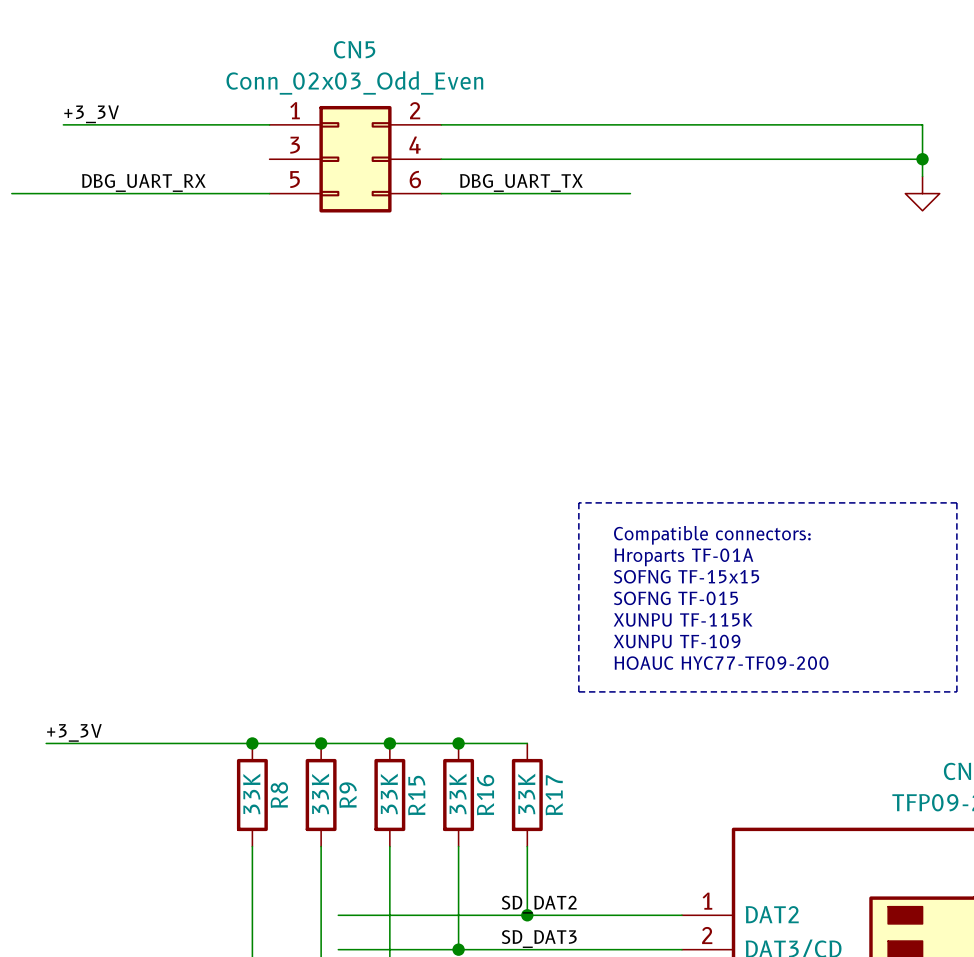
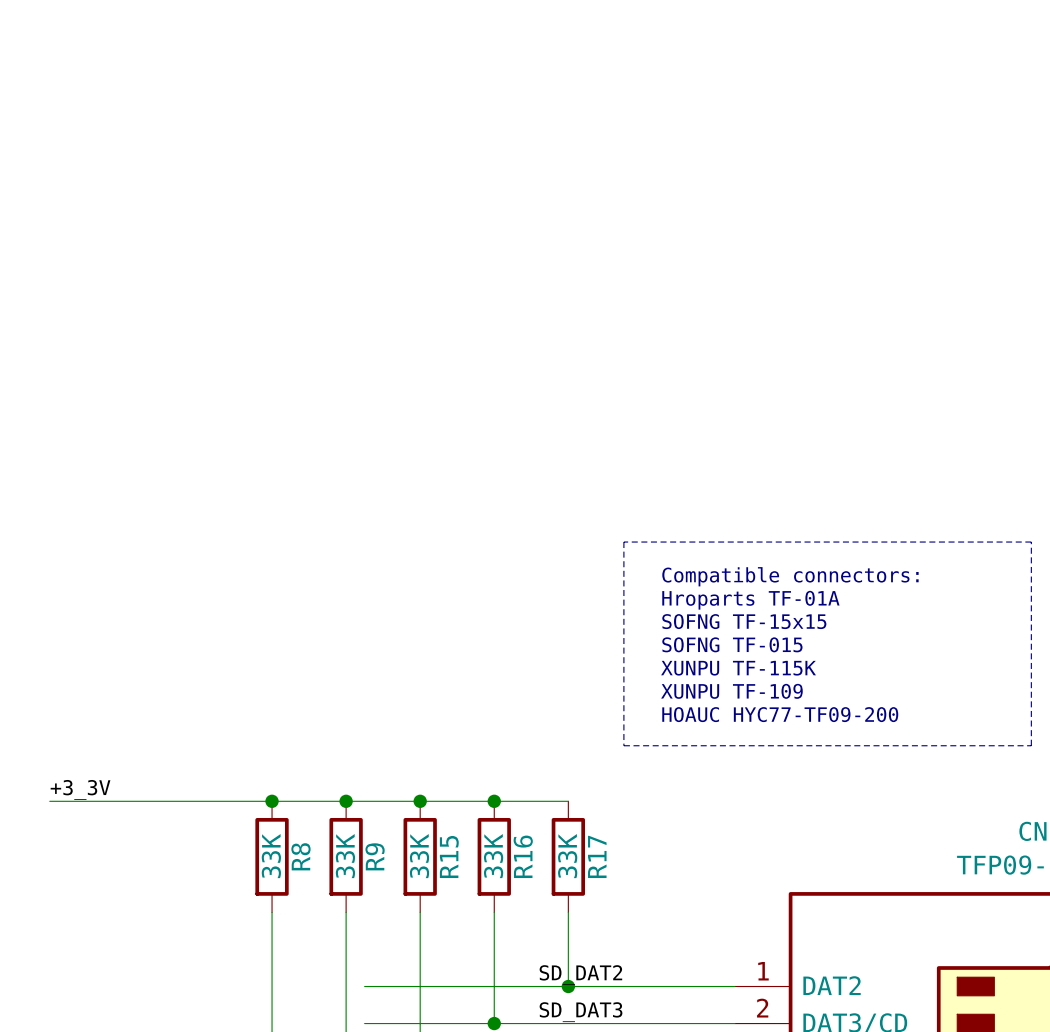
label: +3_3V (91, 114) -> none
wire: (63, 124) (269, 124) -> none
wire: (441, 124) (922, 124) (922, 176) -> none
CN5: Conn_02x03_Odd_Even (355, 159) -> none
wire: (441, 159) (922, 159) -> none
junction: (922, 159) -> none
label: DBG_UART_RX (143, 182) -> none
label: DBG_UART_TX (521, 182) -> none
wire: (11, 193) (269, 193) -> none
wire: (441, 193) (630, 193) -> none
power symbol: (922, 193) -> none

